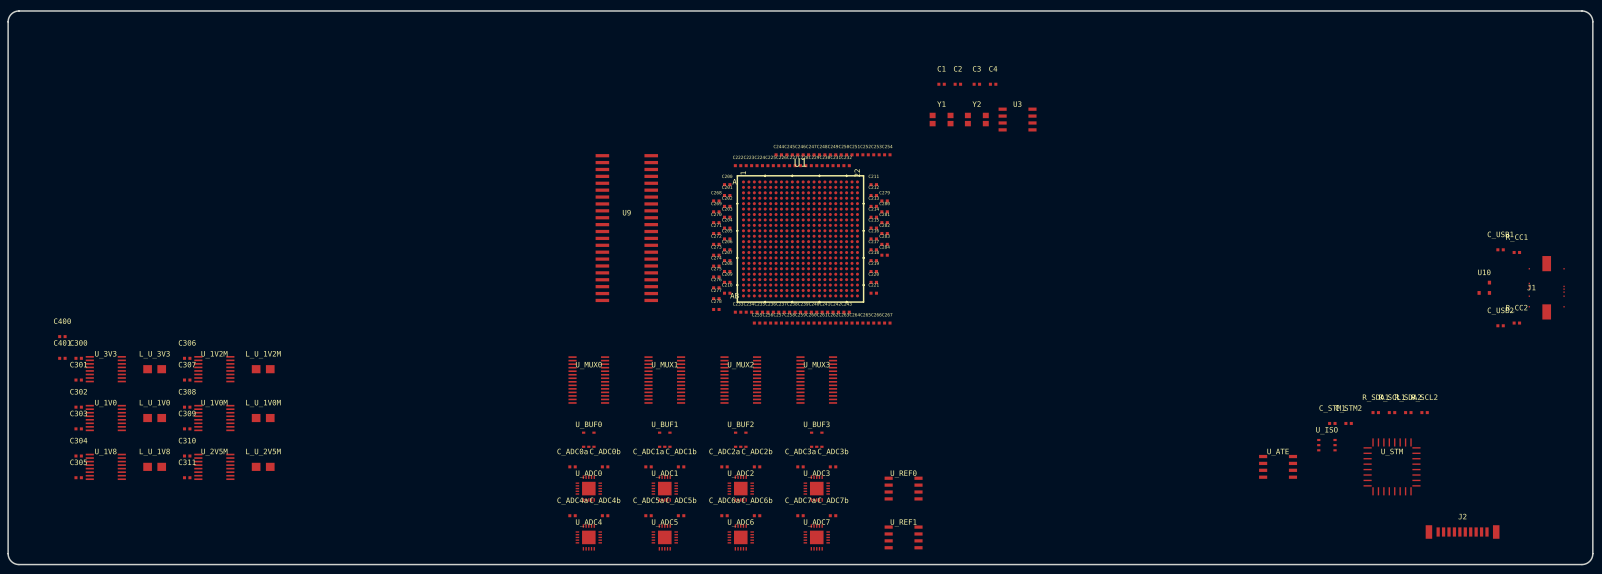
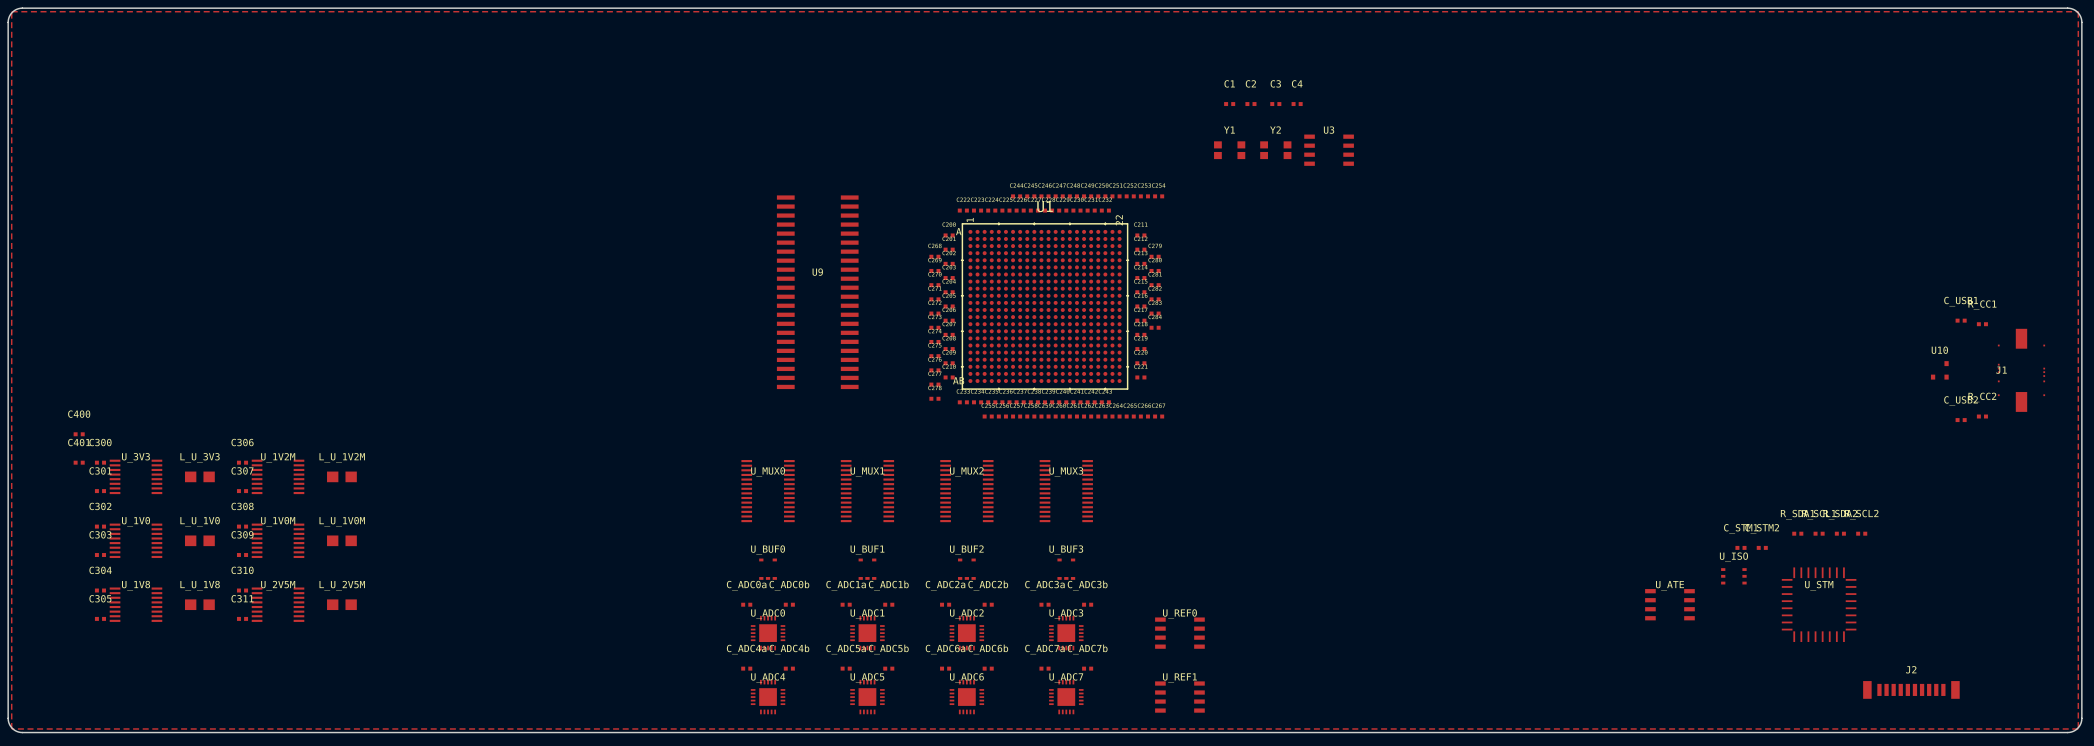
zone outline: none -> (11, 11) (2078, 11) (2078, 728) (11, 728) (11, 11)

